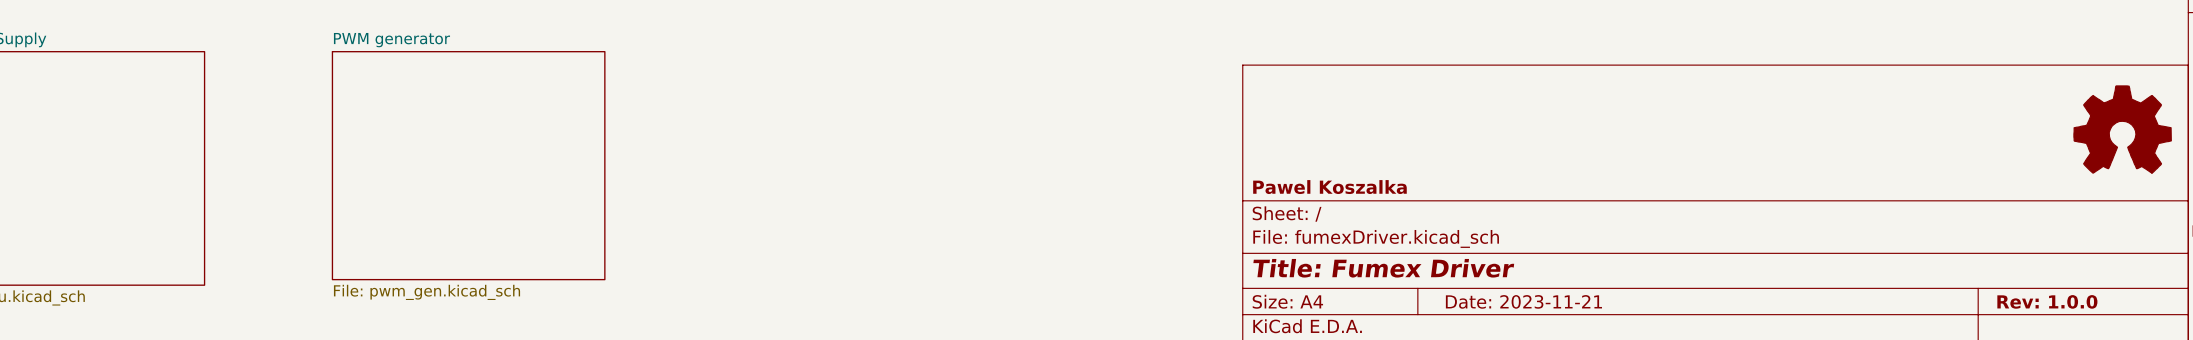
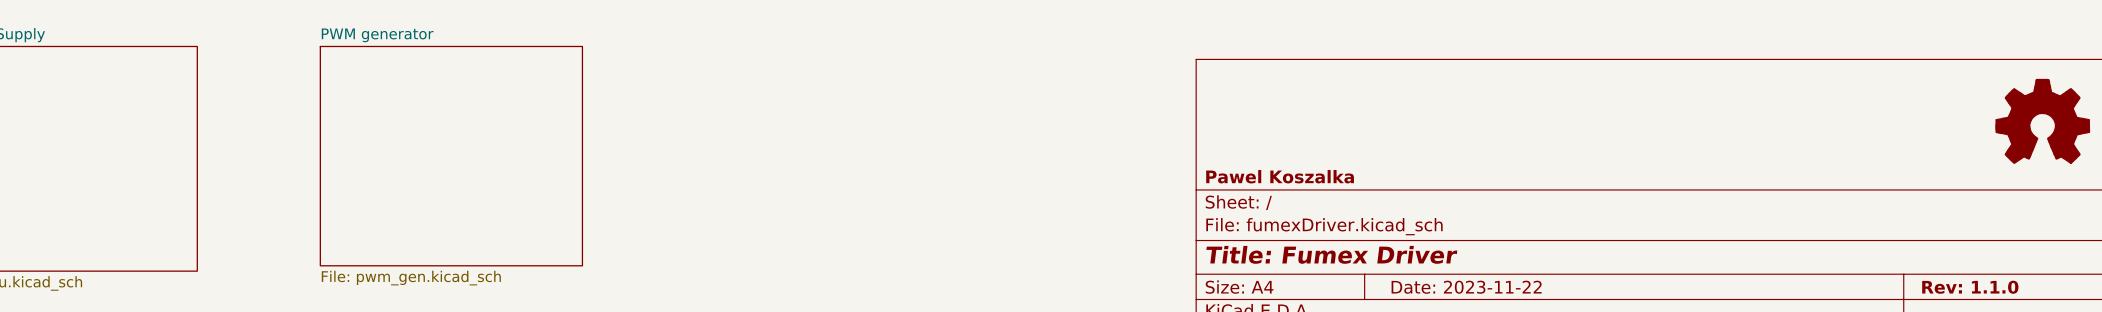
title block: Date: 2023-11-21 (1523, 301) -> Date: 2023-11-22 (1466, 287)
title block: Rev: 1.0.0 (2047, 301) -> Rev: 1.1.0 (1970, 287)

